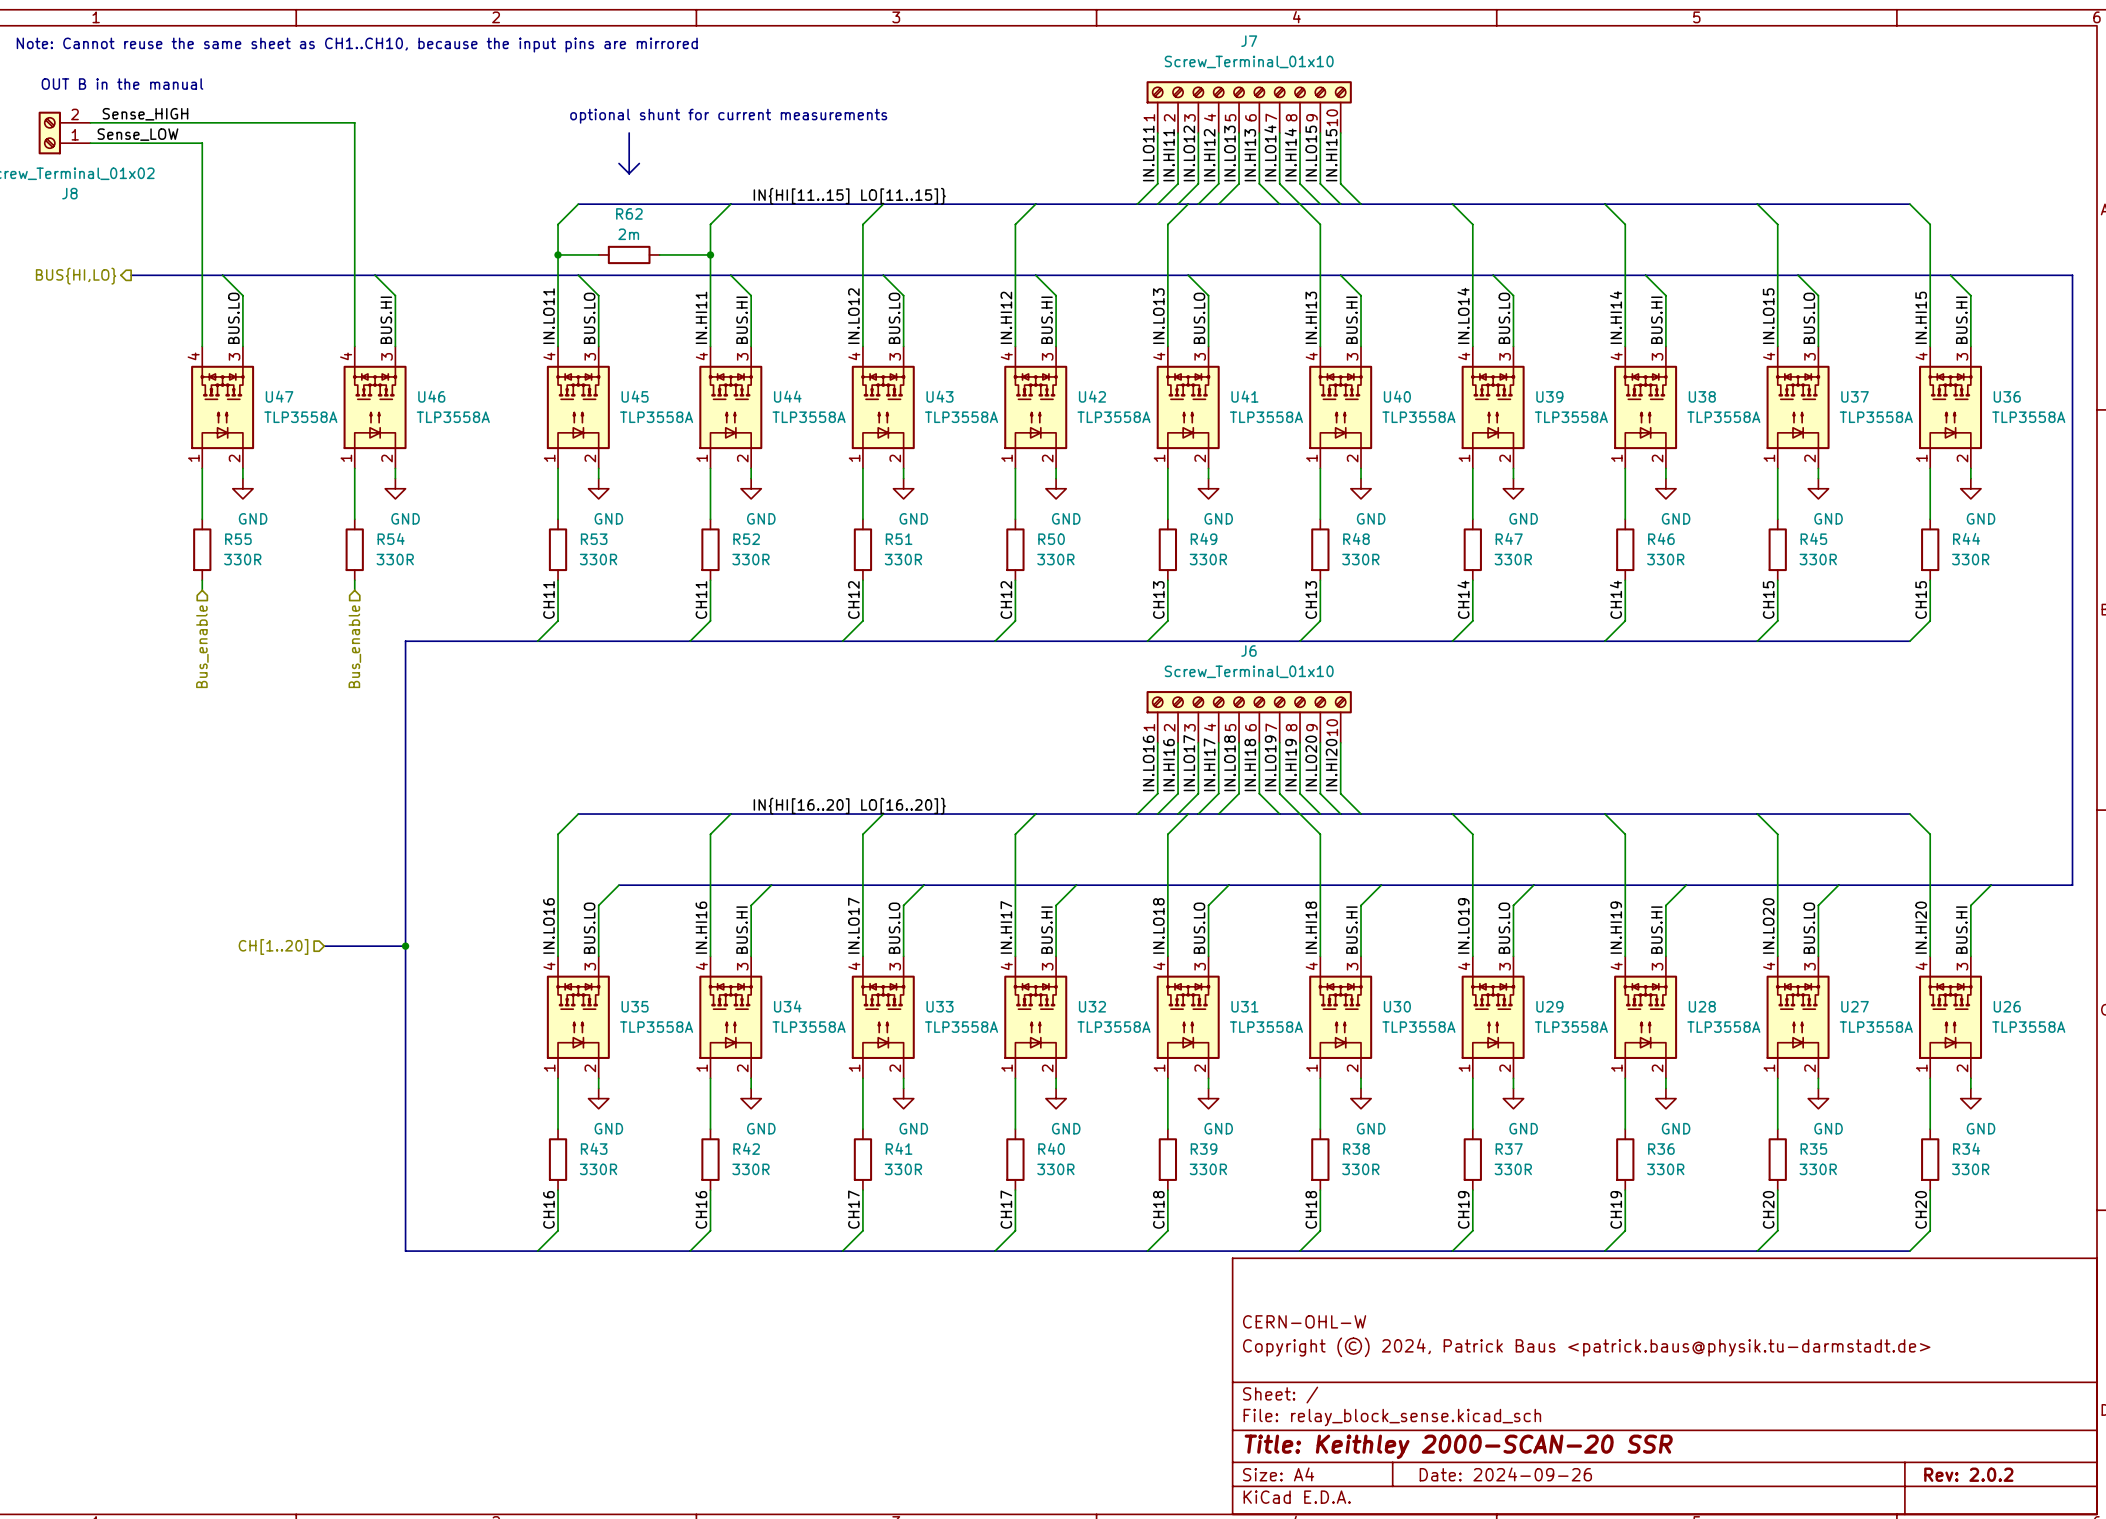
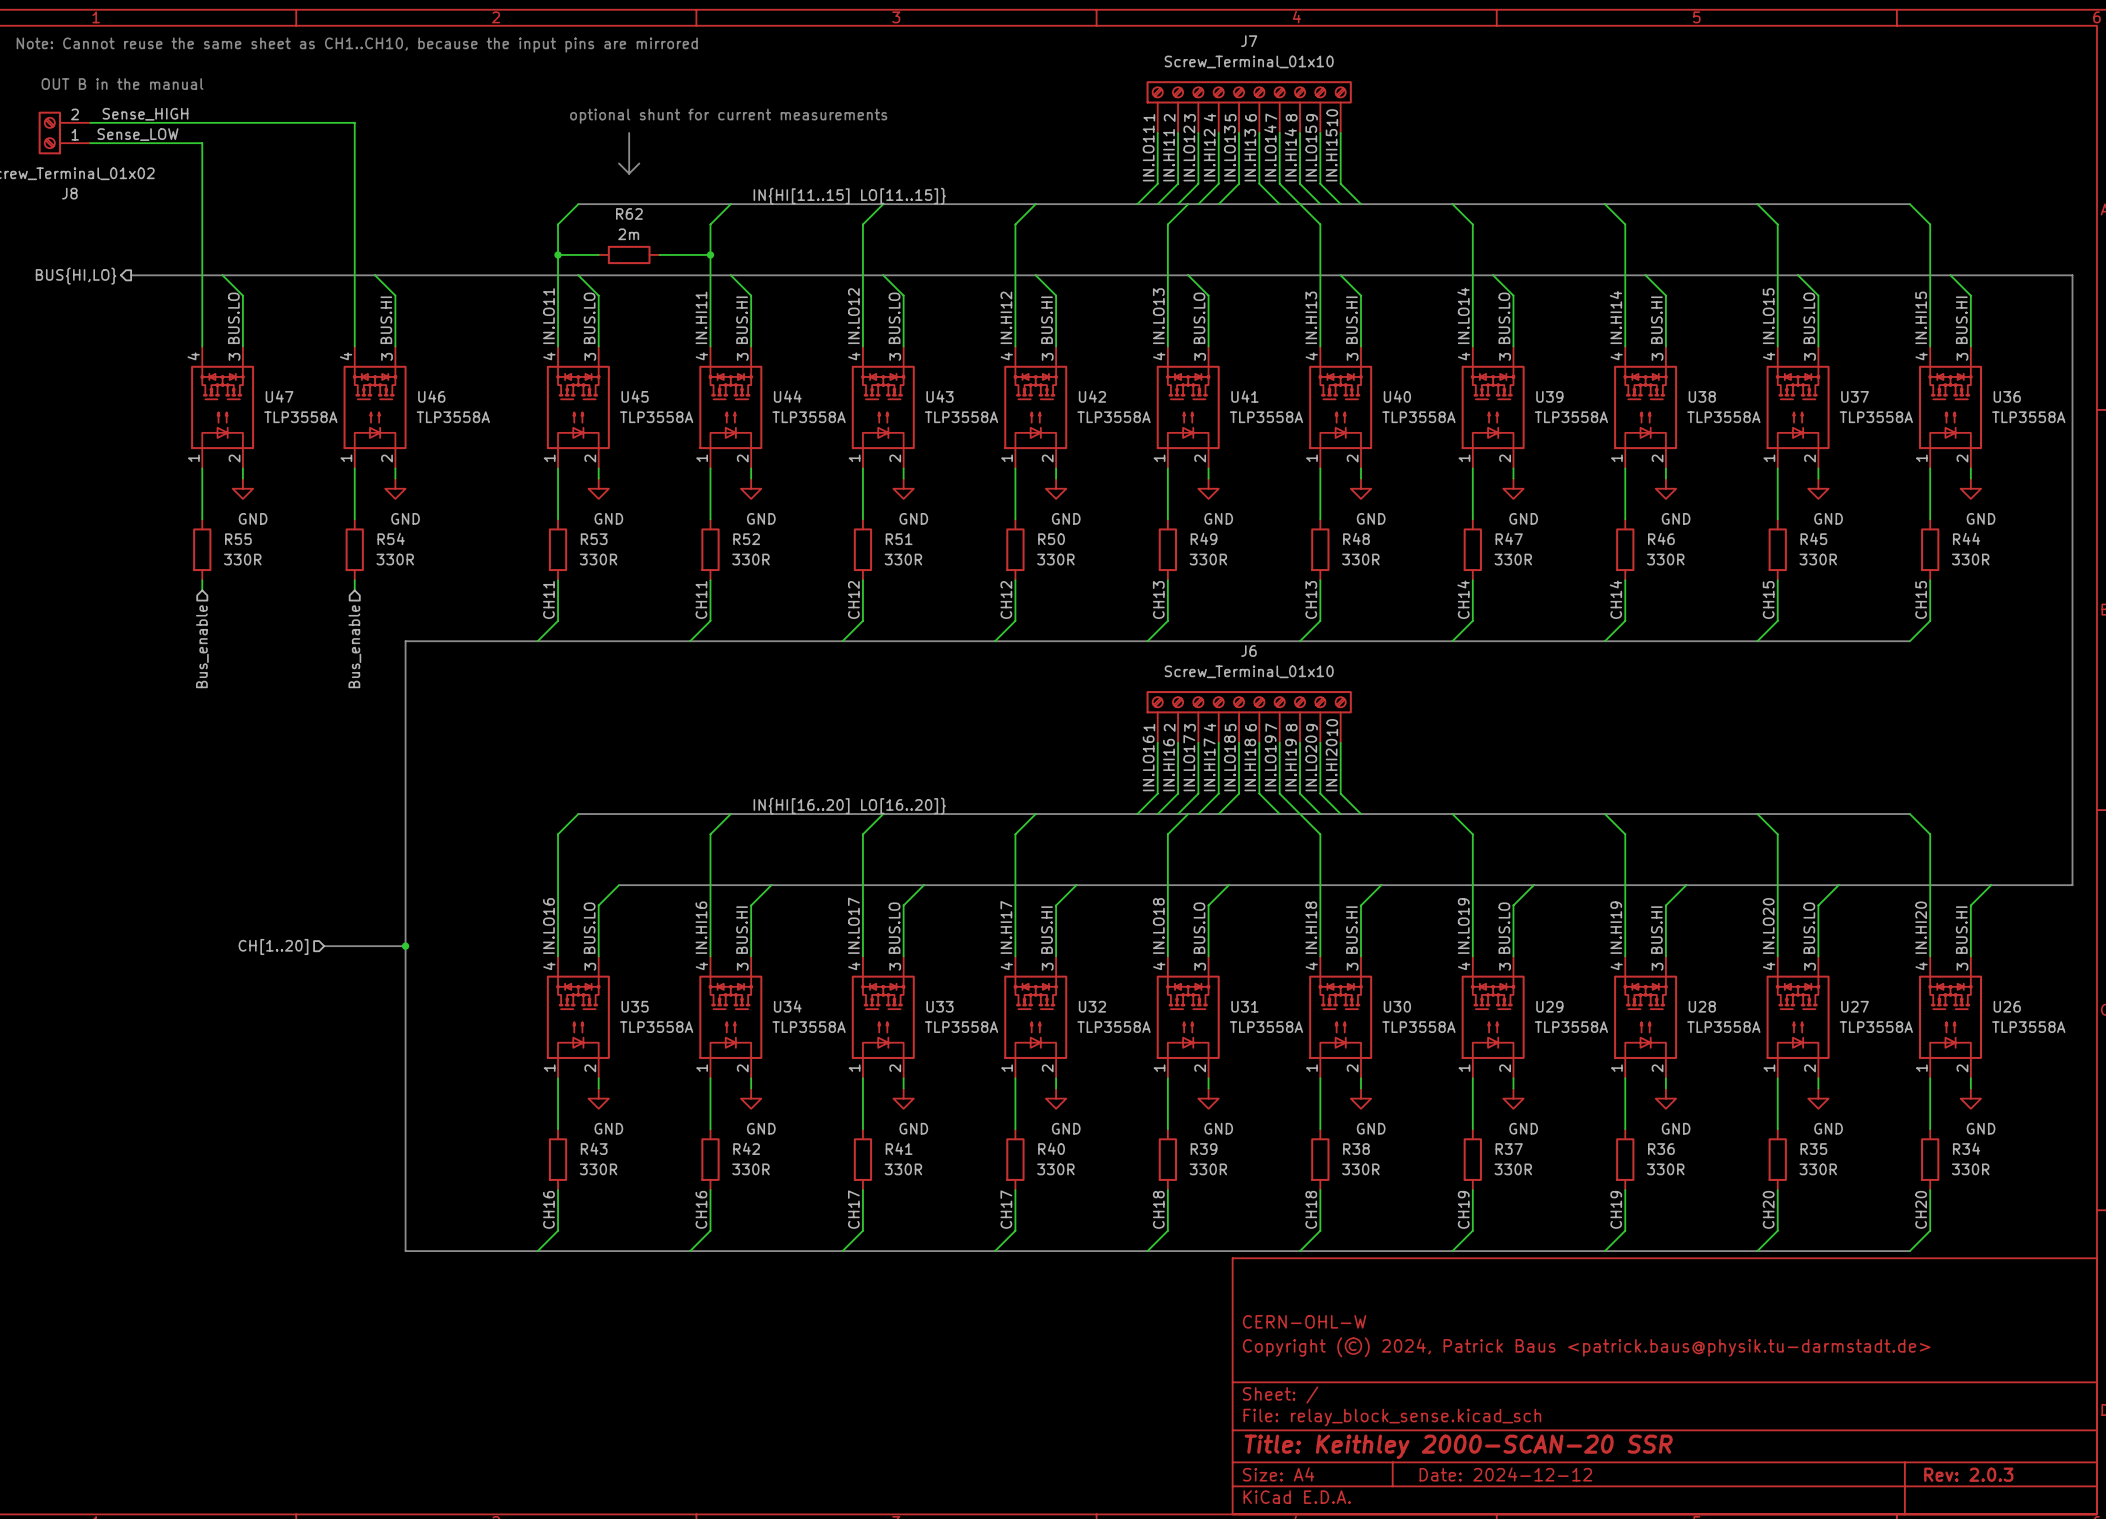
title block: Date: 2024-09-26 (1505, 1474) -> Date: 2024-12-12 (1505, 1474)
title block: Rev: 2.0.2 (1968, 1474) -> Rev: 2.0.3 (1968, 1474)

